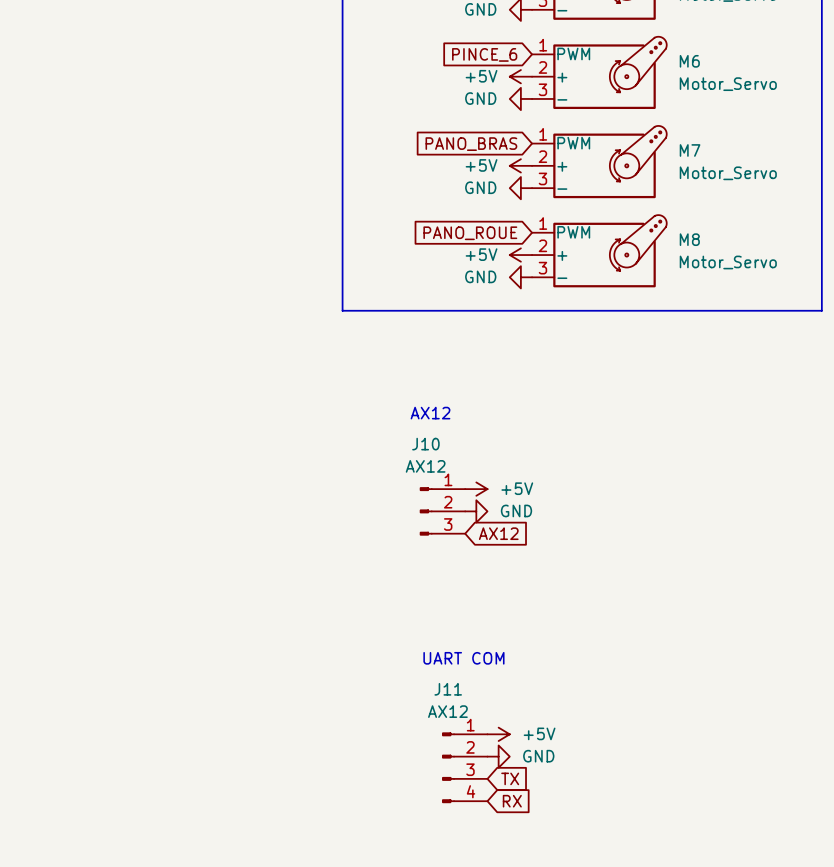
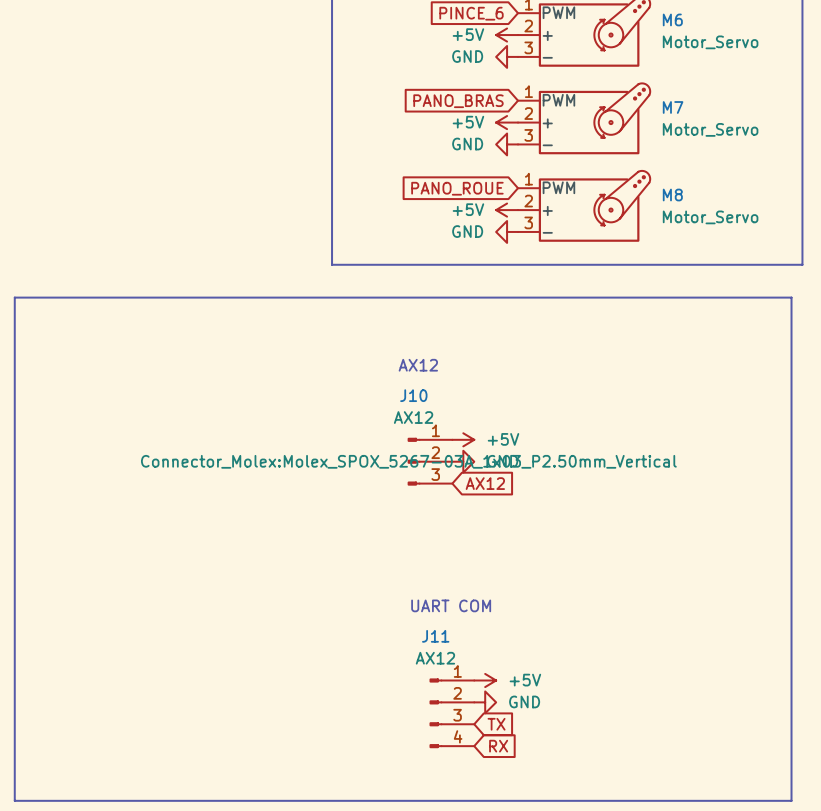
line: none -> (14, 297) (791, 297) (791, 800) (14, 800) (14, 297)
J10 text: none -> Connector_Molex:Molex_SPOX_5267-03A_1x03_P2.50mm_Vertical (408, 461)

